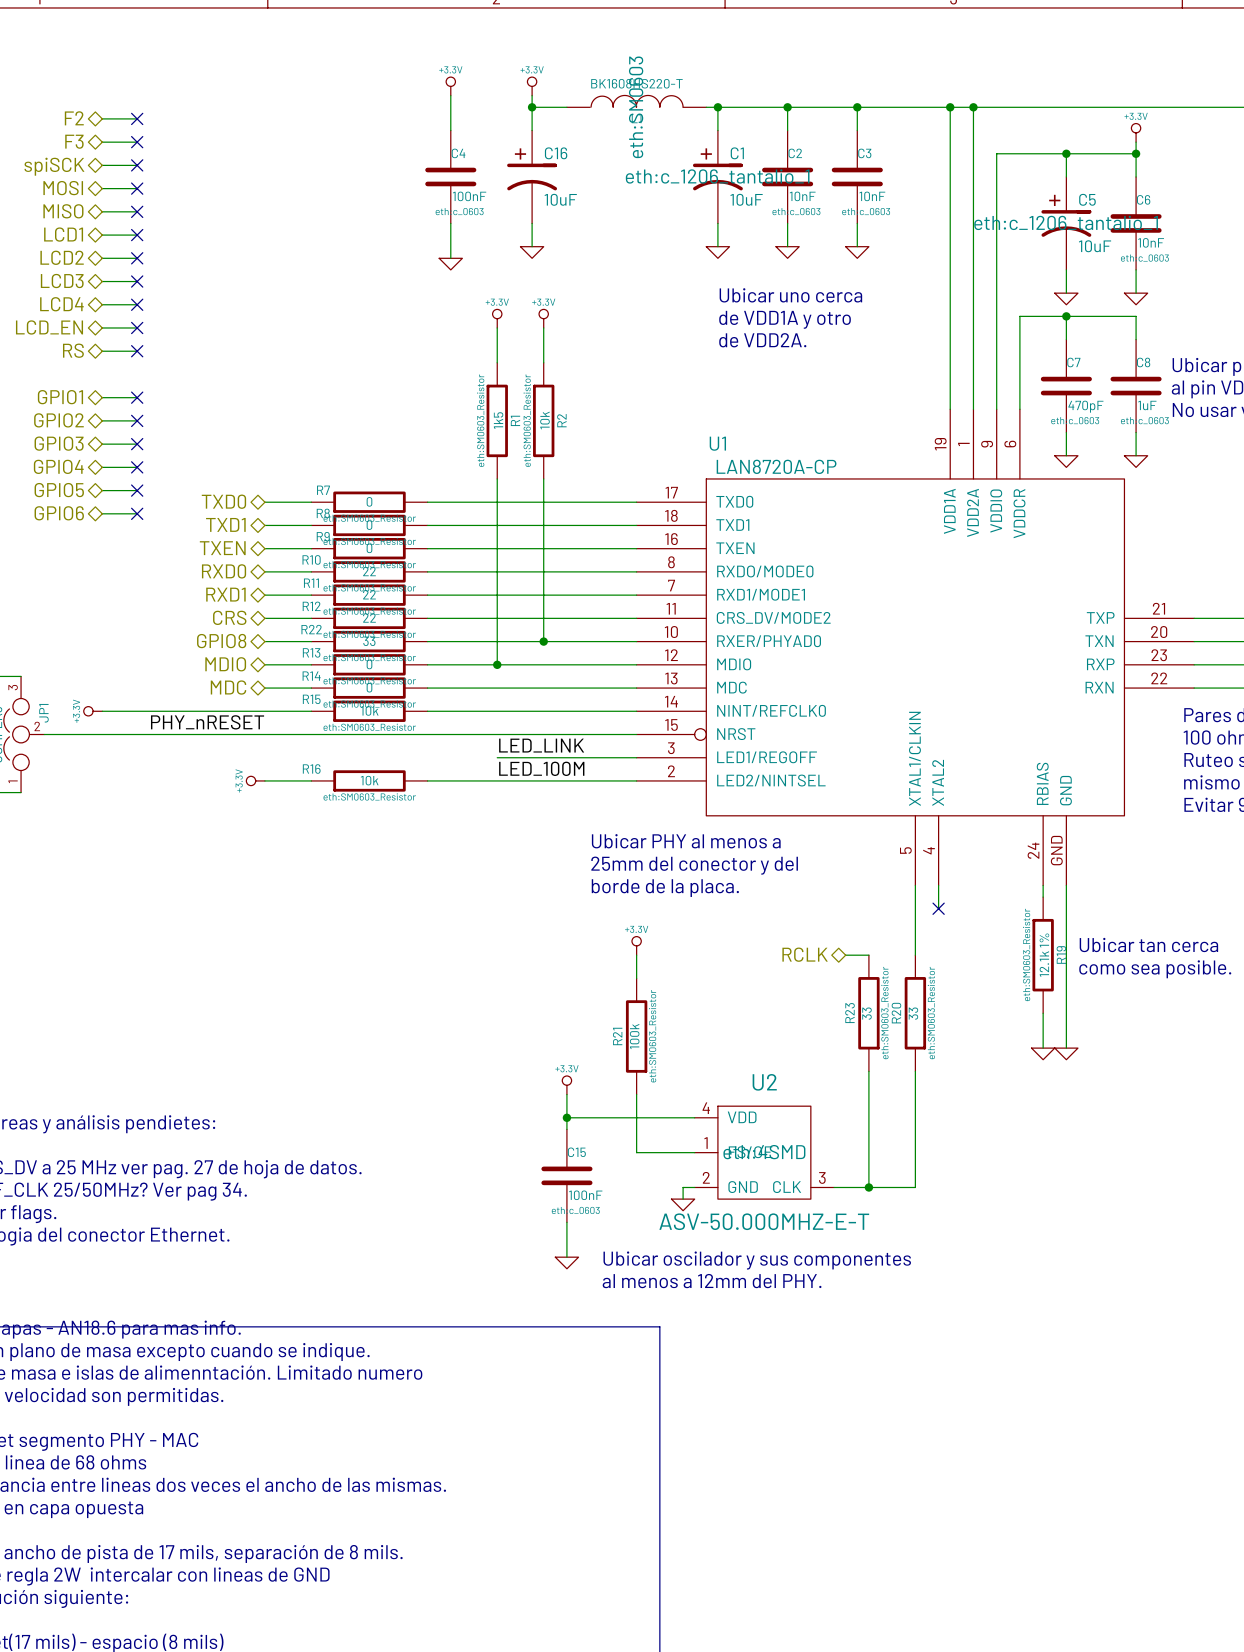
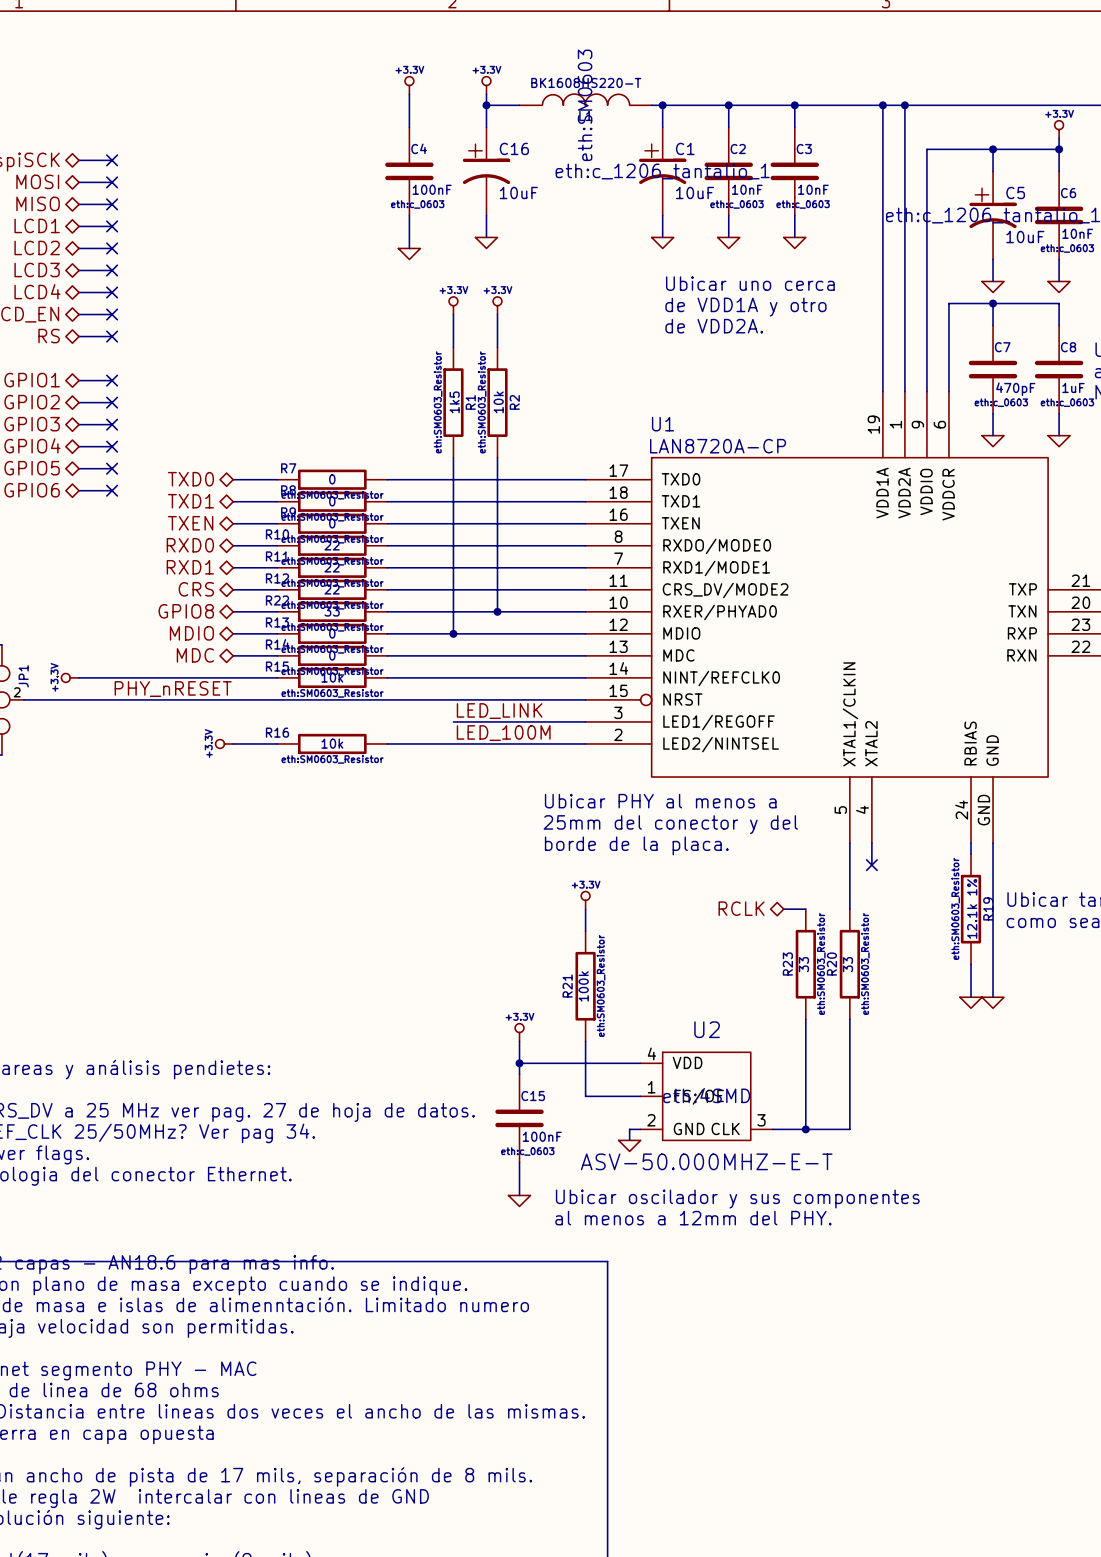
hierarchical label: F2 (74, 118) -> none
wire: (102, 118) (137, 118) -> none
no-connect mark: (137, 118) -> none
hierarchical label: F3 (74, 141) -> none
wire: (102, 142) (137, 142) -> none
no-connect mark: (137, 142) -> none

